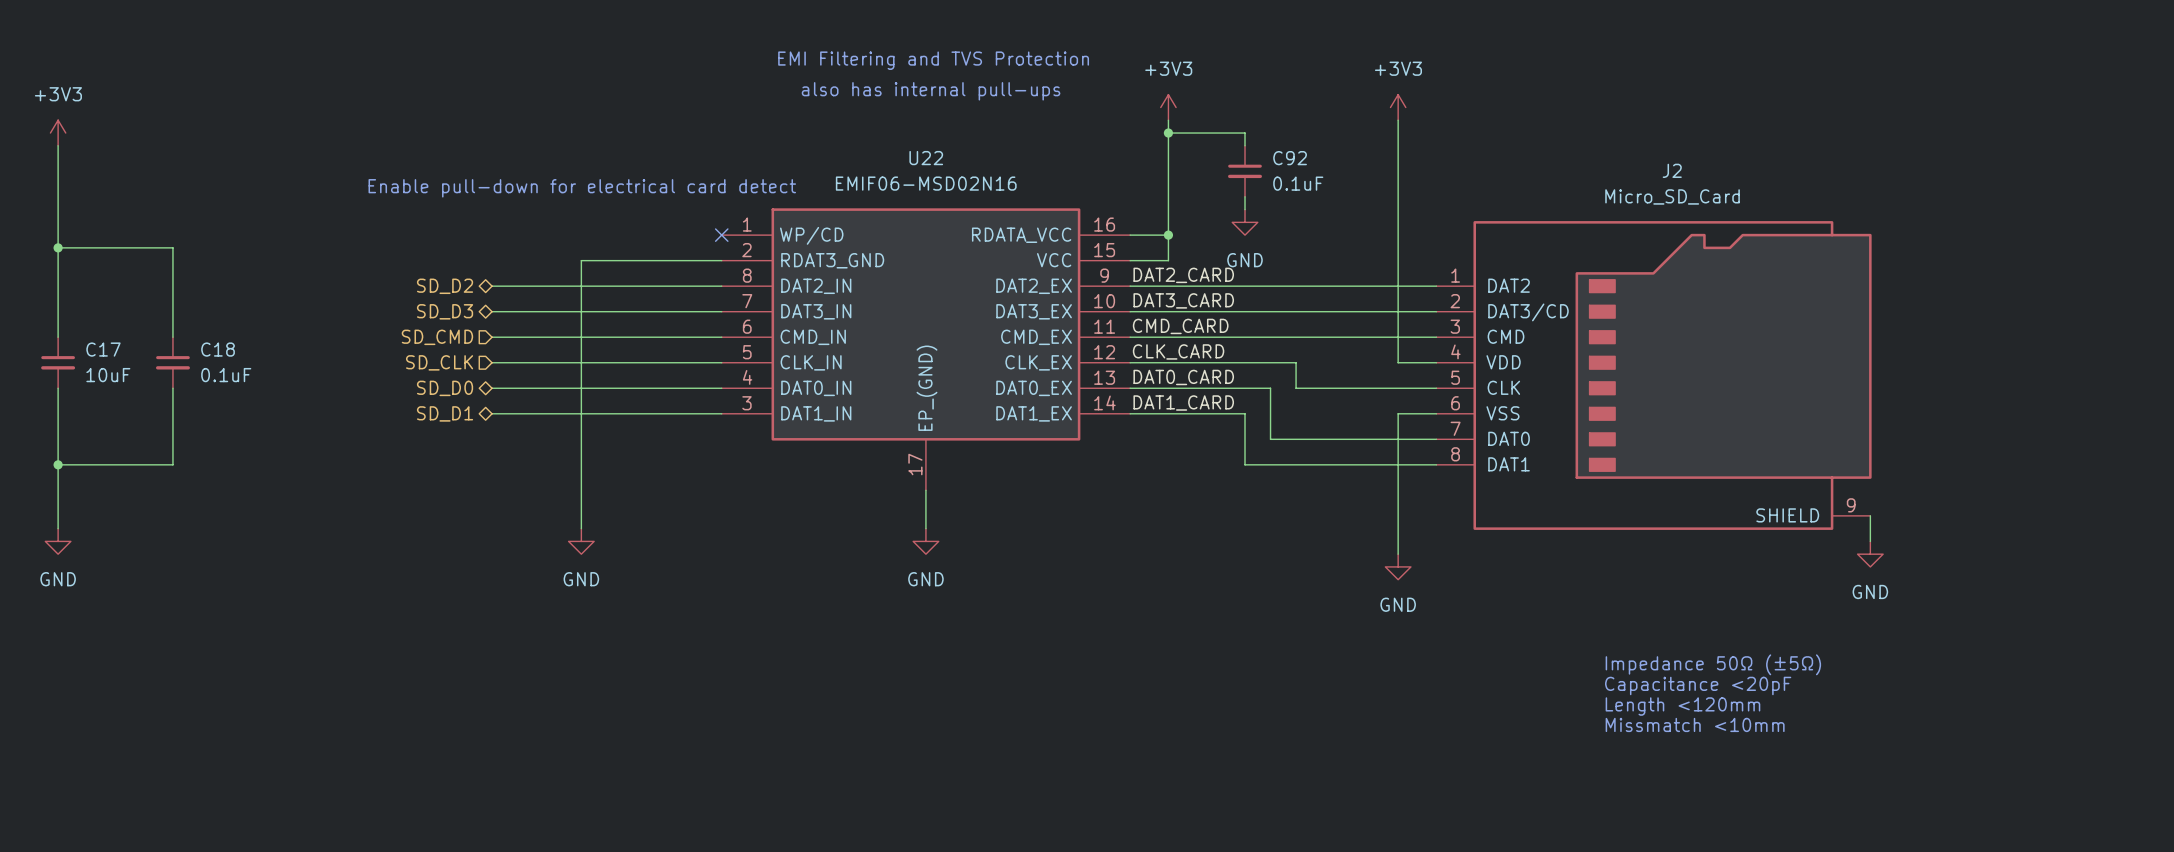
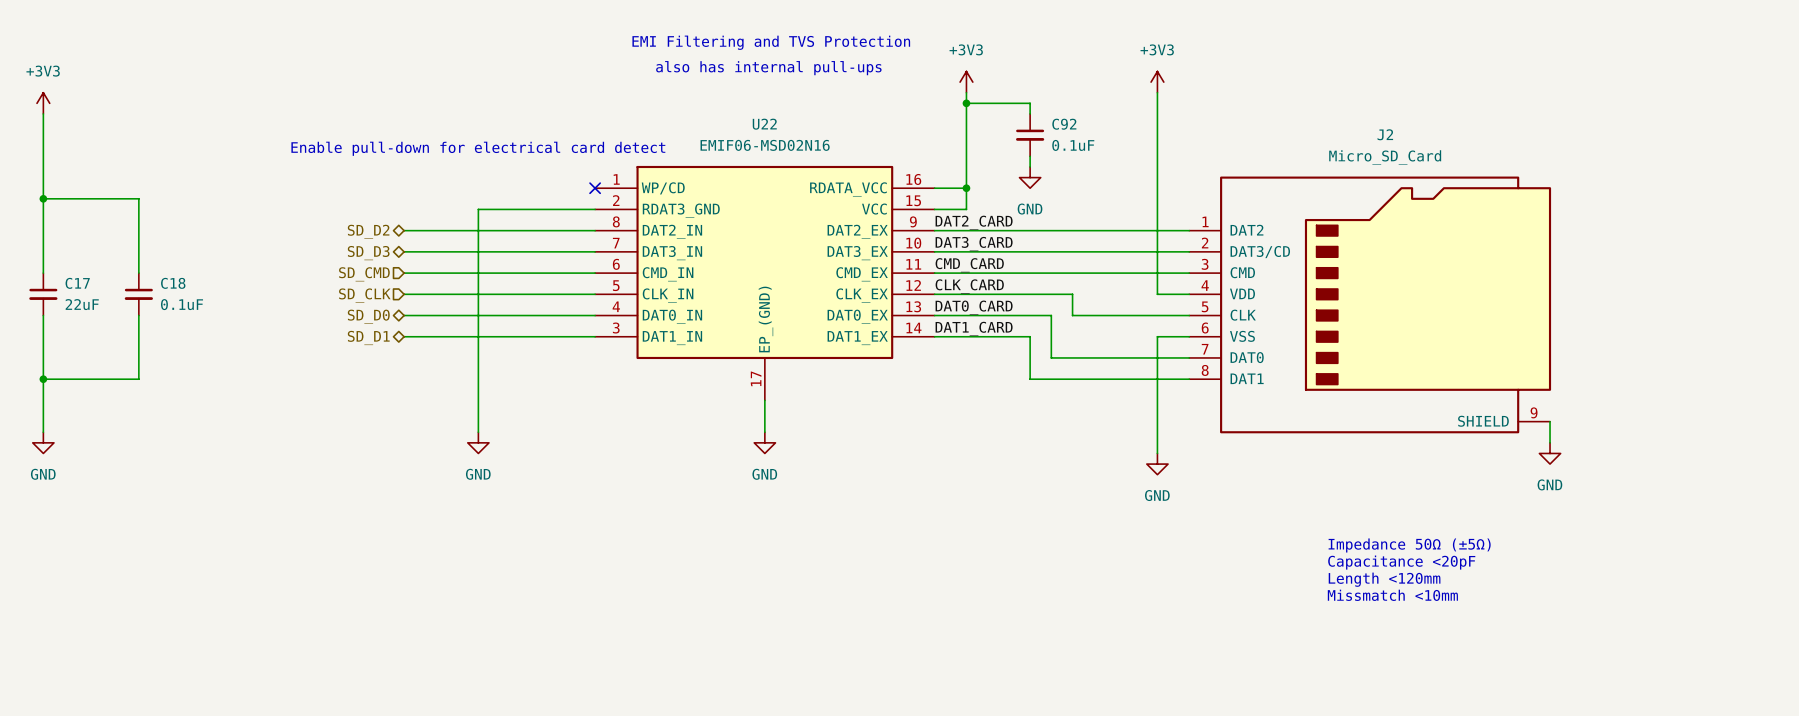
C17 value: 10uF (108, 375) -> 22uF (82, 304)

